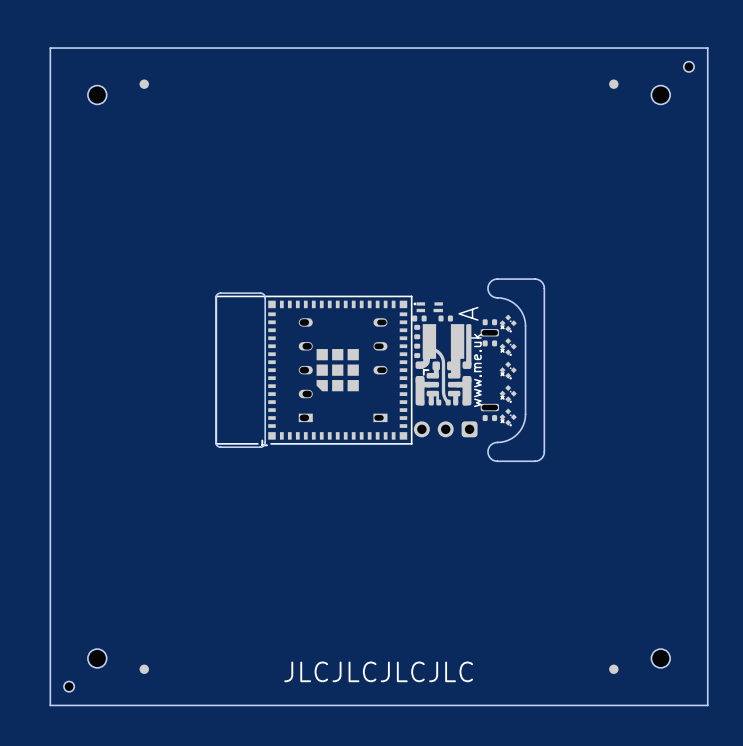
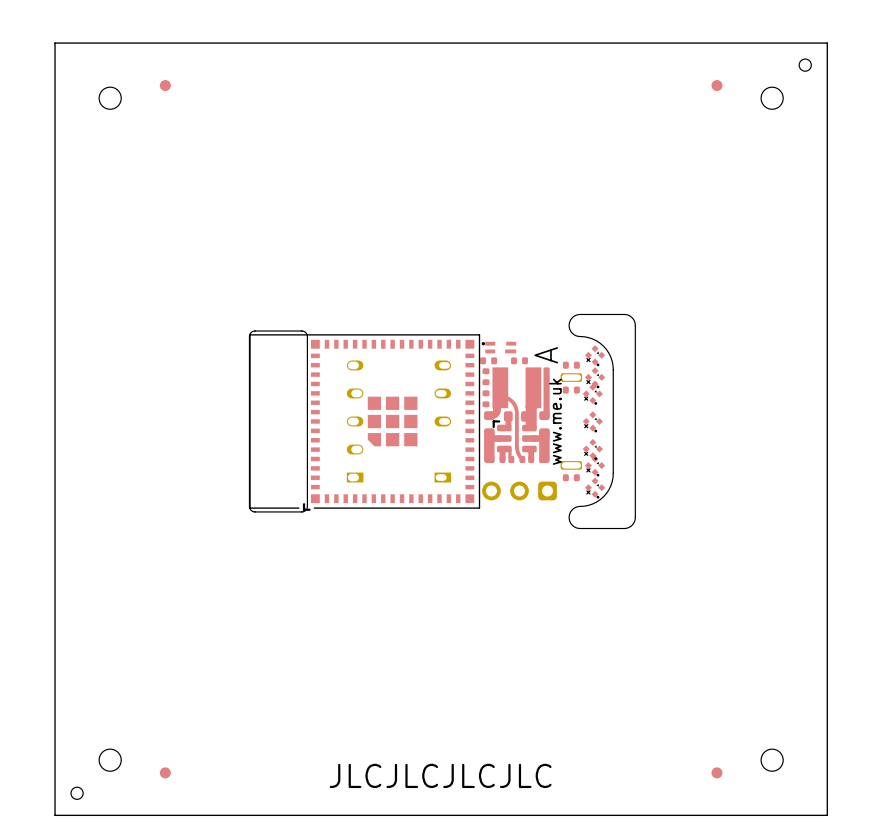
part: none -> (595, 355)
part: (508, 323) -> none
part: none -> (595, 377)
part: none -> (595, 466)
part: (508, 417) -> none
part: none -> (595, 488)

